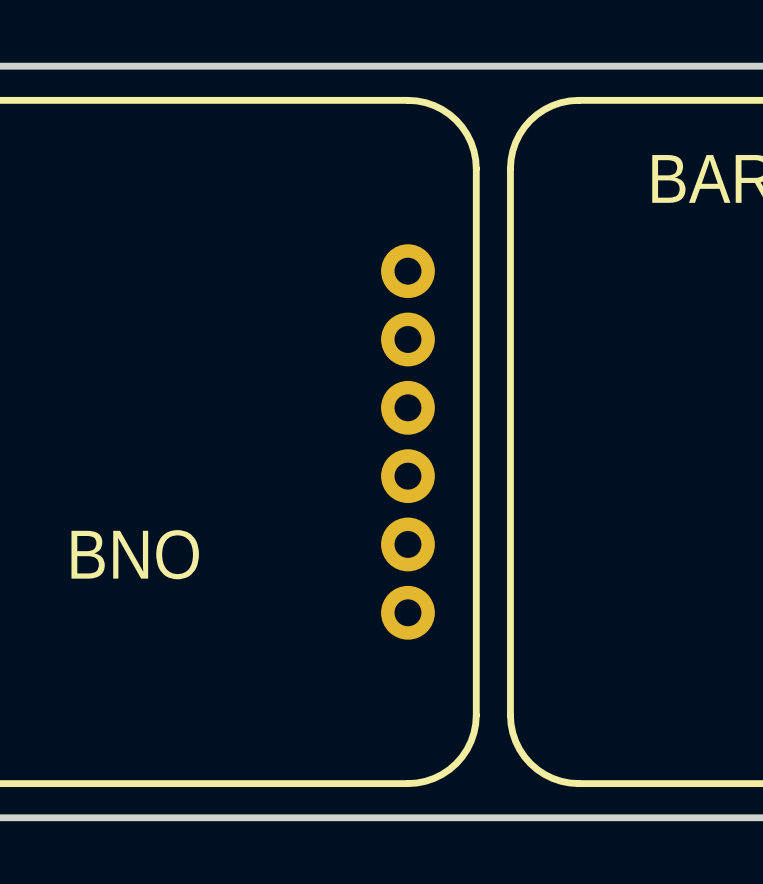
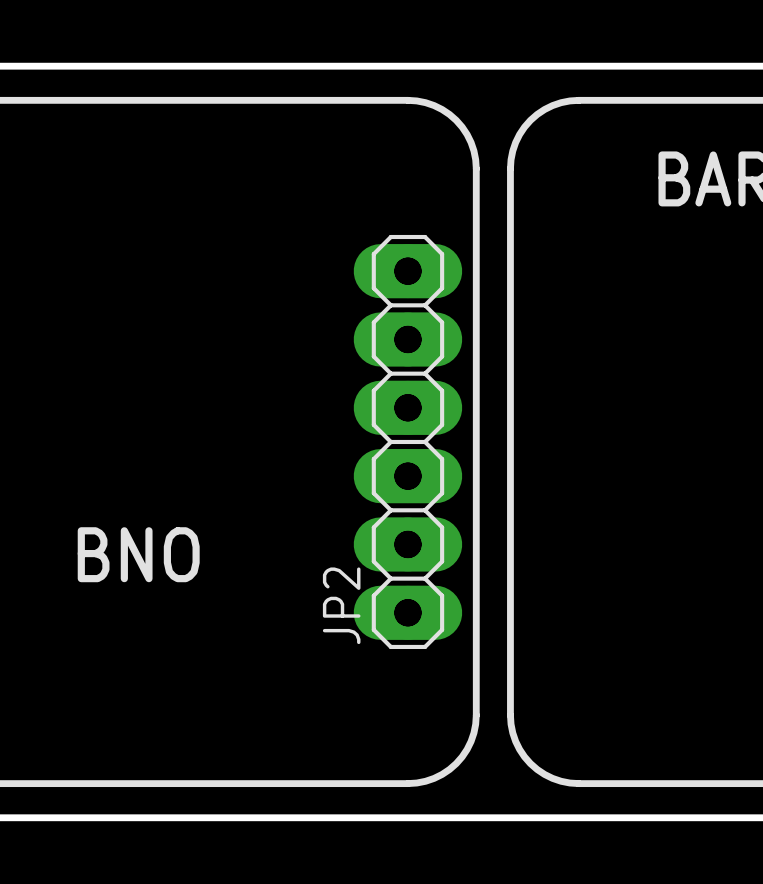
JP2: none -> (407, 441)

